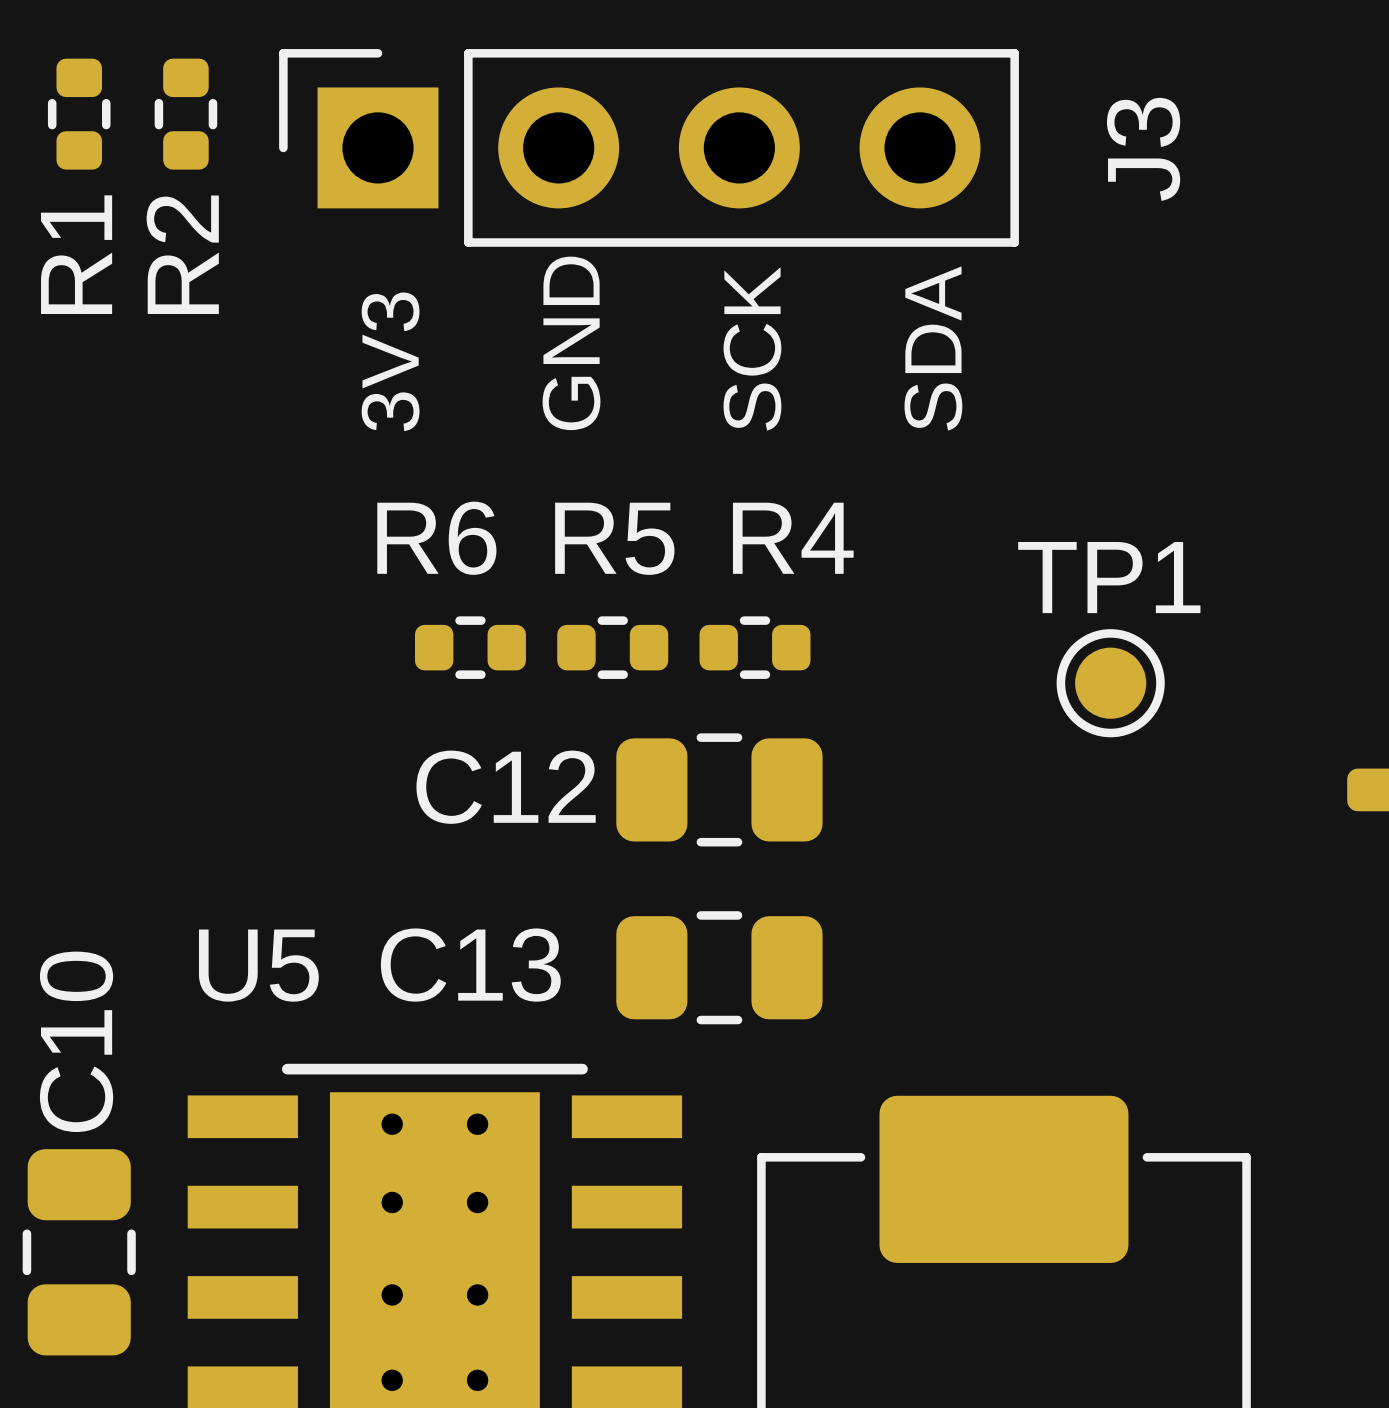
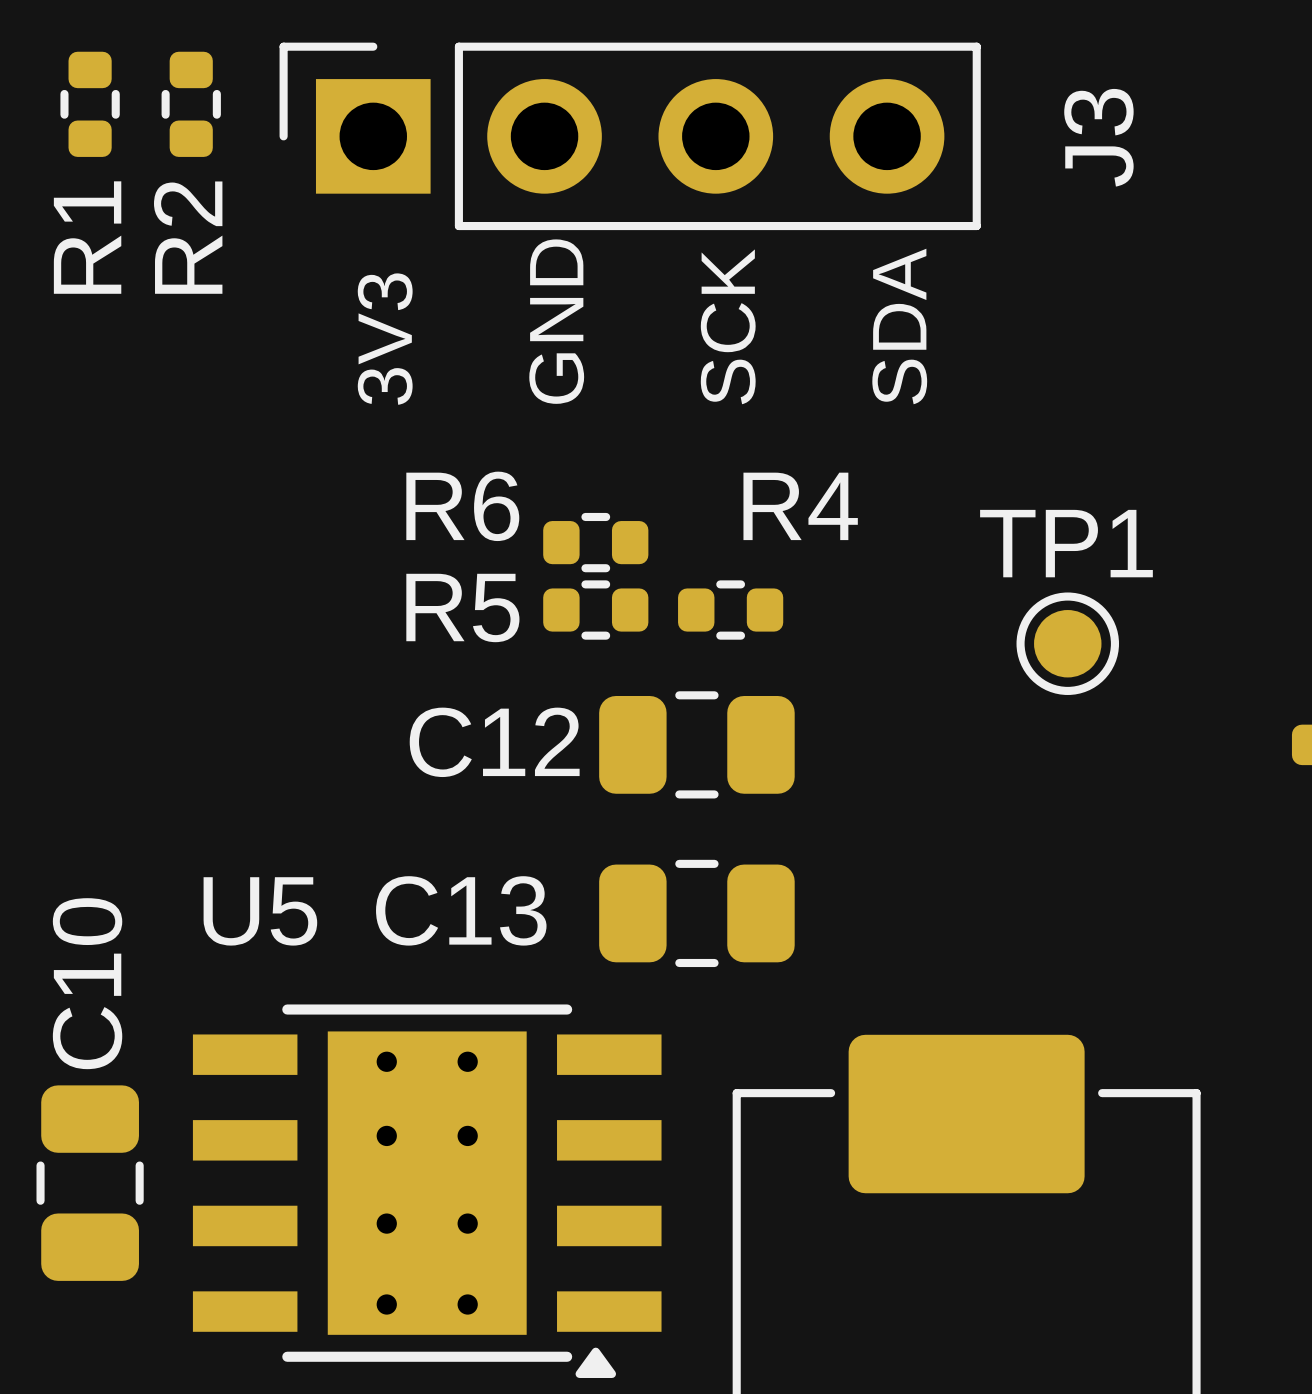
R6 name position: R6 (436, 538) -> R6 (462, 506)
R5 name position: R5 (614, 538) -> R5 (462, 607)
R4 name position: R4 (793, 538) -> R4 (800, 506)
R6 position: (470, 647) -> (595, 542)

